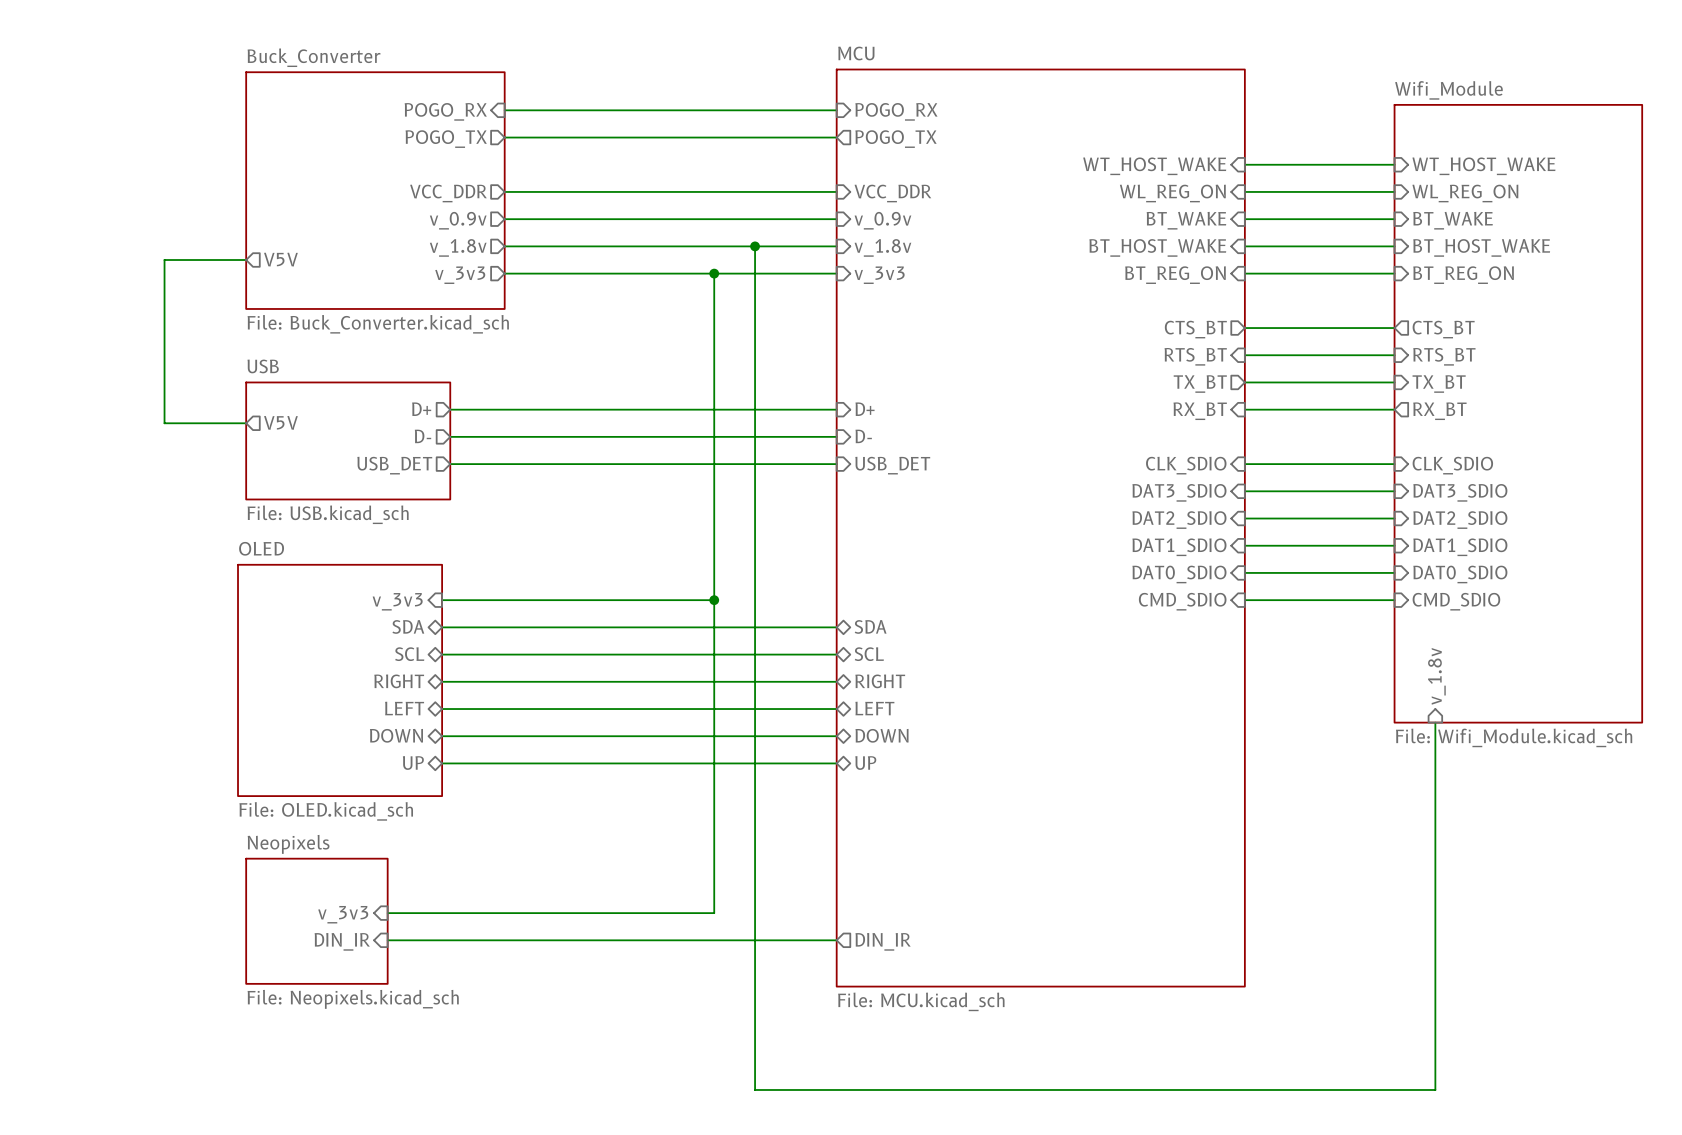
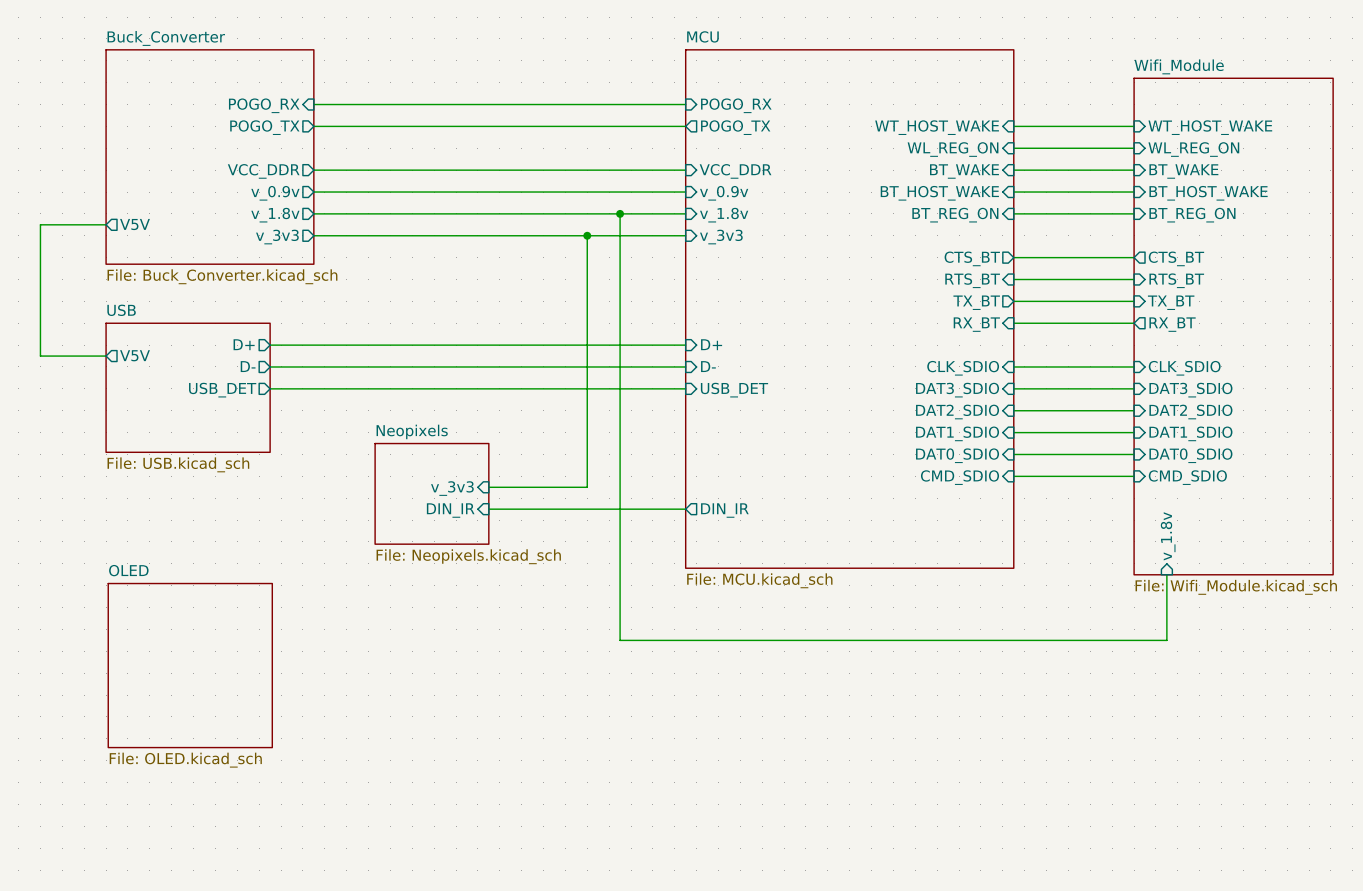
wire: (504, 110) (836, 110) -> none
sheet pin position: POGO_RX (445, 111) -> POGO_RX (264, 105)
sheet pin: POGO_RX (896, 111) -> none
wire: none -> (313, 104) (418, 104)
sheet pin position: POGO_TX (446, 139) -> POGO_TX (264, 127)
sheet pin shape: output (895, 139) -> input (736, 105)
sheet pin: POGO_TX (895, 139) -> POGO_RX (736, 105)
wire: none -> (313, 126) (685, 126)
sheet pin: none -> POGO_TX (735, 127)
sheet Buck_Converter: File: Buck_Converter.kicad_sch (375, 190) -> none
wire: (504, 191) (836, 191) -> none
sheet pin position: VCC_DDR (448, 193) -> VCC_DDR (263, 171)
sheet pin: VCC_DDR (892, 193) -> none
sheet Buck_Converter: none -> File: Buck_Converter.kicad_sch (209, 157)
wire: none -> (313, 170) (418, 170)
sheet pin position: v_0.9v (458, 220) -> v_0.9v (275, 193)
sheet pin: v_0.9v (882, 220) -> VCC_DDR (735, 171)
wire: none -> (313, 192) (418, 192)
wire: (755, 246) (755, 273) -> none
junction: (755, 246) -> none
sheet pin position: v_1.8v (458, 247) -> v_1.8v (275, 215)
sheet pin: v_1.8v (882, 247) -> v_0.9v (724, 193)
sheet pin: V5V (280, 259) -> none
wire: (246, 260) (164, 260) (164, 423) (246, 423) -> (106, 224) (40, 224) (40, 356) (106, 356)
wire: none -> (313, 213) (418, 213)
wire: (714, 273) (714, 300) -> none
junction: (714, 273) -> none
junction: none -> (620, 213)
sheet pin position: v_3v3 (460, 275) -> v_3v3 (277, 237)
sheet pin: v_3v3 (879, 275) -> v_1.8v (724, 215)
sheet pin: none -> V5V (134, 224)
wire: none -> (313, 235) (685, 235)
junction: none -> (587, 235)
sheet pin: none -> v_3v3 (721, 237)
sheet MCU: none -> File: MCU.kicad_sch (849, 309)
sheet pin position: D+ (421, 409) -> D+ (244, 344)
wire: (450, 409) (836, 409) -> none
sheet pin: D+ (865, 409) -> none
sheet pin: V5V (280, 422) -> none
wire: none -> (270, 345) (375, 345)
sheet pin position: D- (423, 436) -> D- (248, 366)
sheet pin: D- (863, 436) -> D+ (711, 344)
sheet USB: File: USB.kicad_sch (348, 440) -> none
sheet pin: none -> V5V (134, 355)
wire: none -> (270, 366) (375, 366)
sheet pin position: USB_DET (394, 465) -> USB_DET (222, 390)
sheet pin: USB_DET (892, 465) -> D- (708, 366)
sheet USB: none -> File: USB.kicad_sch (188, 387)
wire: none -> (270, 388) (685, 388)
sheet pin: none -> USB_DET (734, 390)
sheet MCU: File: MCU.kicad_sch (1040, 528) -> none
wire: (442, 600) (714, 600) -> none
junction: (714, 600) -> none
sheet pin position: v_3v3 (397, 601) -> v_3v3 (452, 488)
wire: (714, 613) (714, 913) (387, 913) -> (587, 487) (488, 487)
sheet Neopixels: none -> File: Neopixels.kicad_sch (431, 493)
sheet pin: SDA (408, 626) -> none
sheet pin: SDA (870, 626) -> none
wire: (442, 627) (836, 627) -> none
wire: none -> (488, 509) (685, 509)
sheet pin: none -> DIN_IR (450, 510)
sheet pin: none -> DIN_IR (724, 510)
sheet pin: SCL (409, 654) -> none
wire: (442, 654) (836, 654) -> none
sheet pin: SCL (869, 654) -> none
sheet OLED: File: OLED.kicad_sch (340, 680) -> none
sheet pin: RIGHT (399, 681) -> none
wire: (442, 681) (836, 681) -> none
sheet pin: RIGHT (880, 681) -> none
sheet pin: LEFT (404, 708) -> none
sheet pin: LEFT (874, 708) -> none
wire: (442, 709) (836, 709) -> none
sheet pin: DOWN (396, 735) -> none
sheet pin: DOWN (882, 735) -> none
wire: (442, 736) (836, 736) -> none
sheet pin: UP (413, 763) -> none
wire: (442, 763) (836, 763) -> none
sheet pin: UP (865, 763) -> none
wire: (755, 804) (755, 1089) (1435, 1089) (1435, 804) -> (620, 640) (1166, 640)
sheet OLED: none -> File: OLED.kicad_sch (190, 665)
sheet pin: v_3v3 (343, 914) -> none
sheet Neopixels: File: Neopixels.kicad_sch (316, 921) -> none
wire: (387, 940) (836, 940) -> none
sheet pin: DIN_IR (342, 941) -> none
sheet pin: DIN_IR (883, 941) -> none

